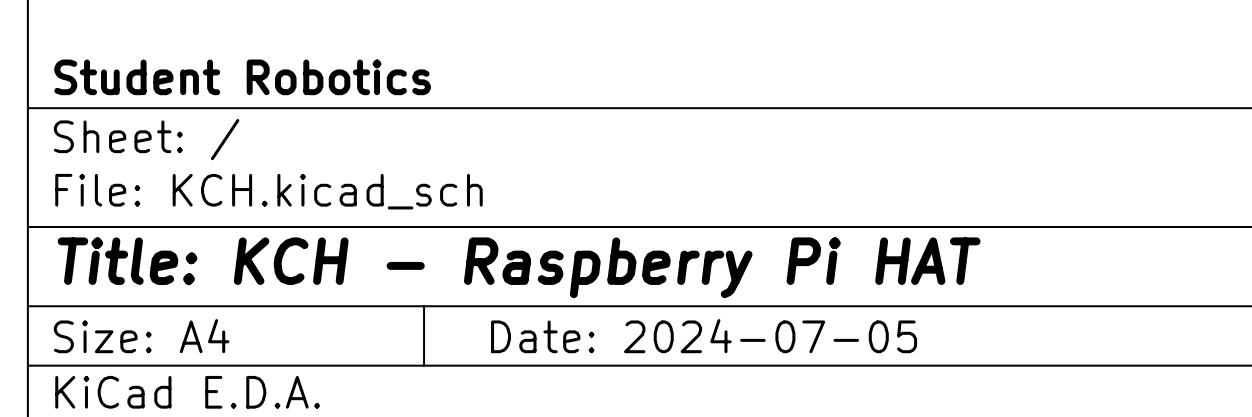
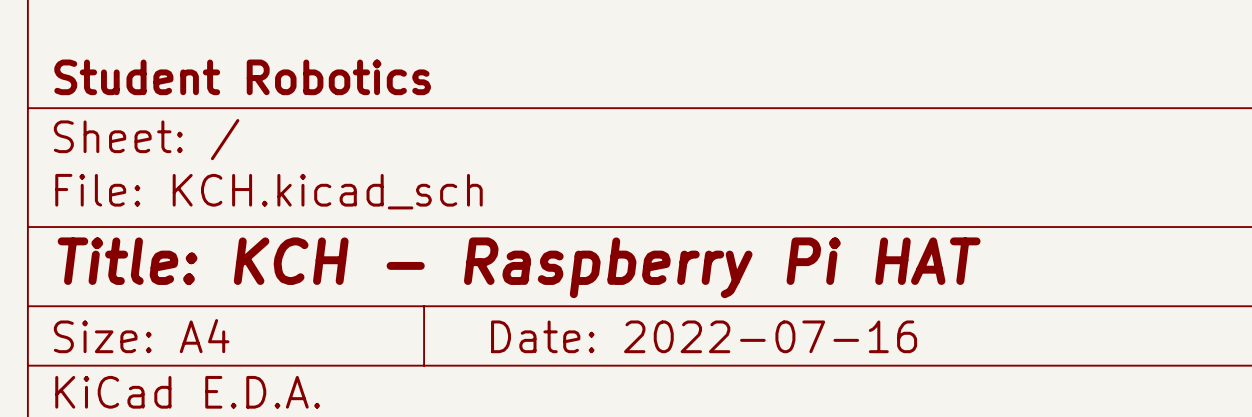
title block: Date: 2024-07-05 (704, 336) -> Date: 2022-07-16 (704, 336)

